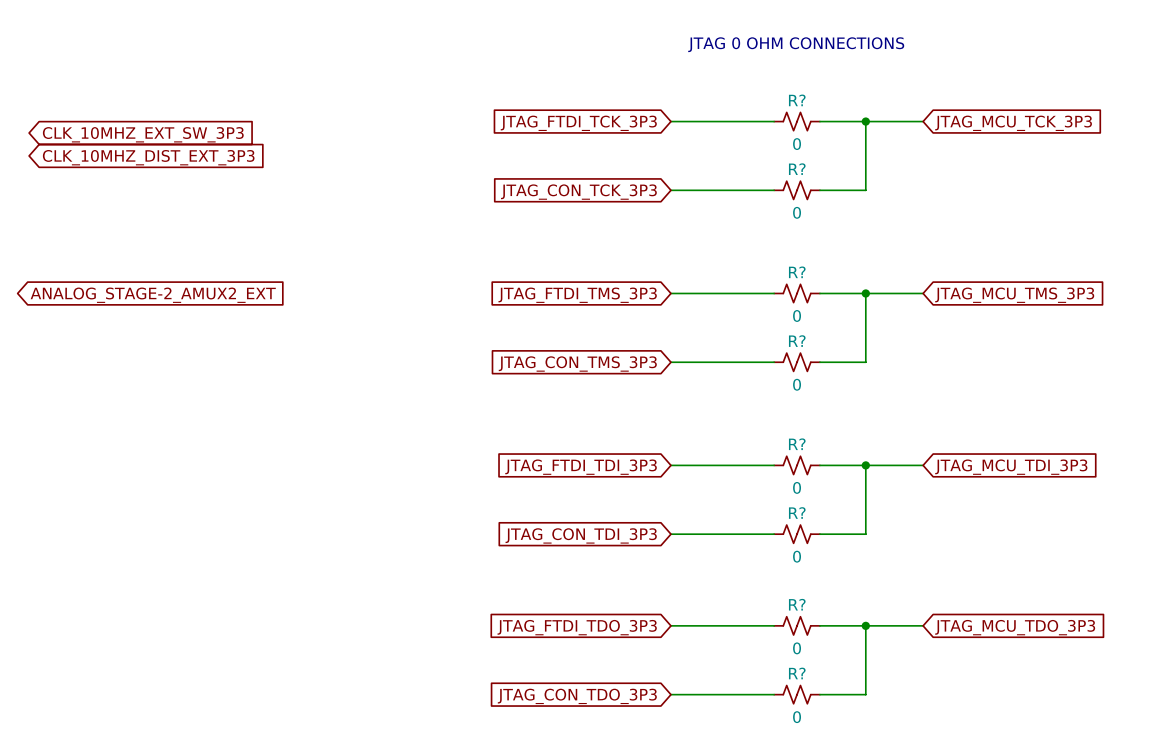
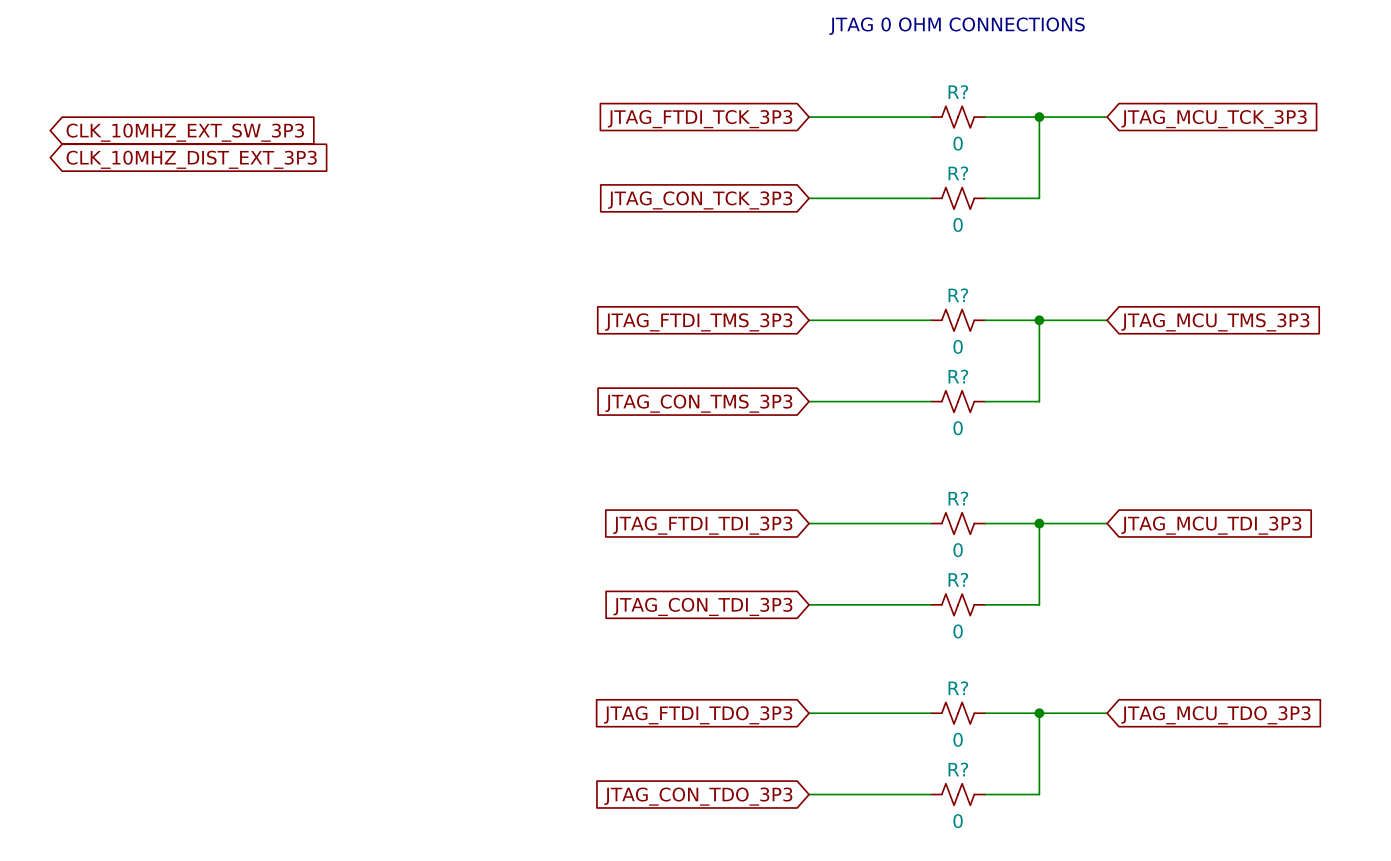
global label: ANALOG_STAGE-2_AMUX2_EXT (153, 295) -> none

